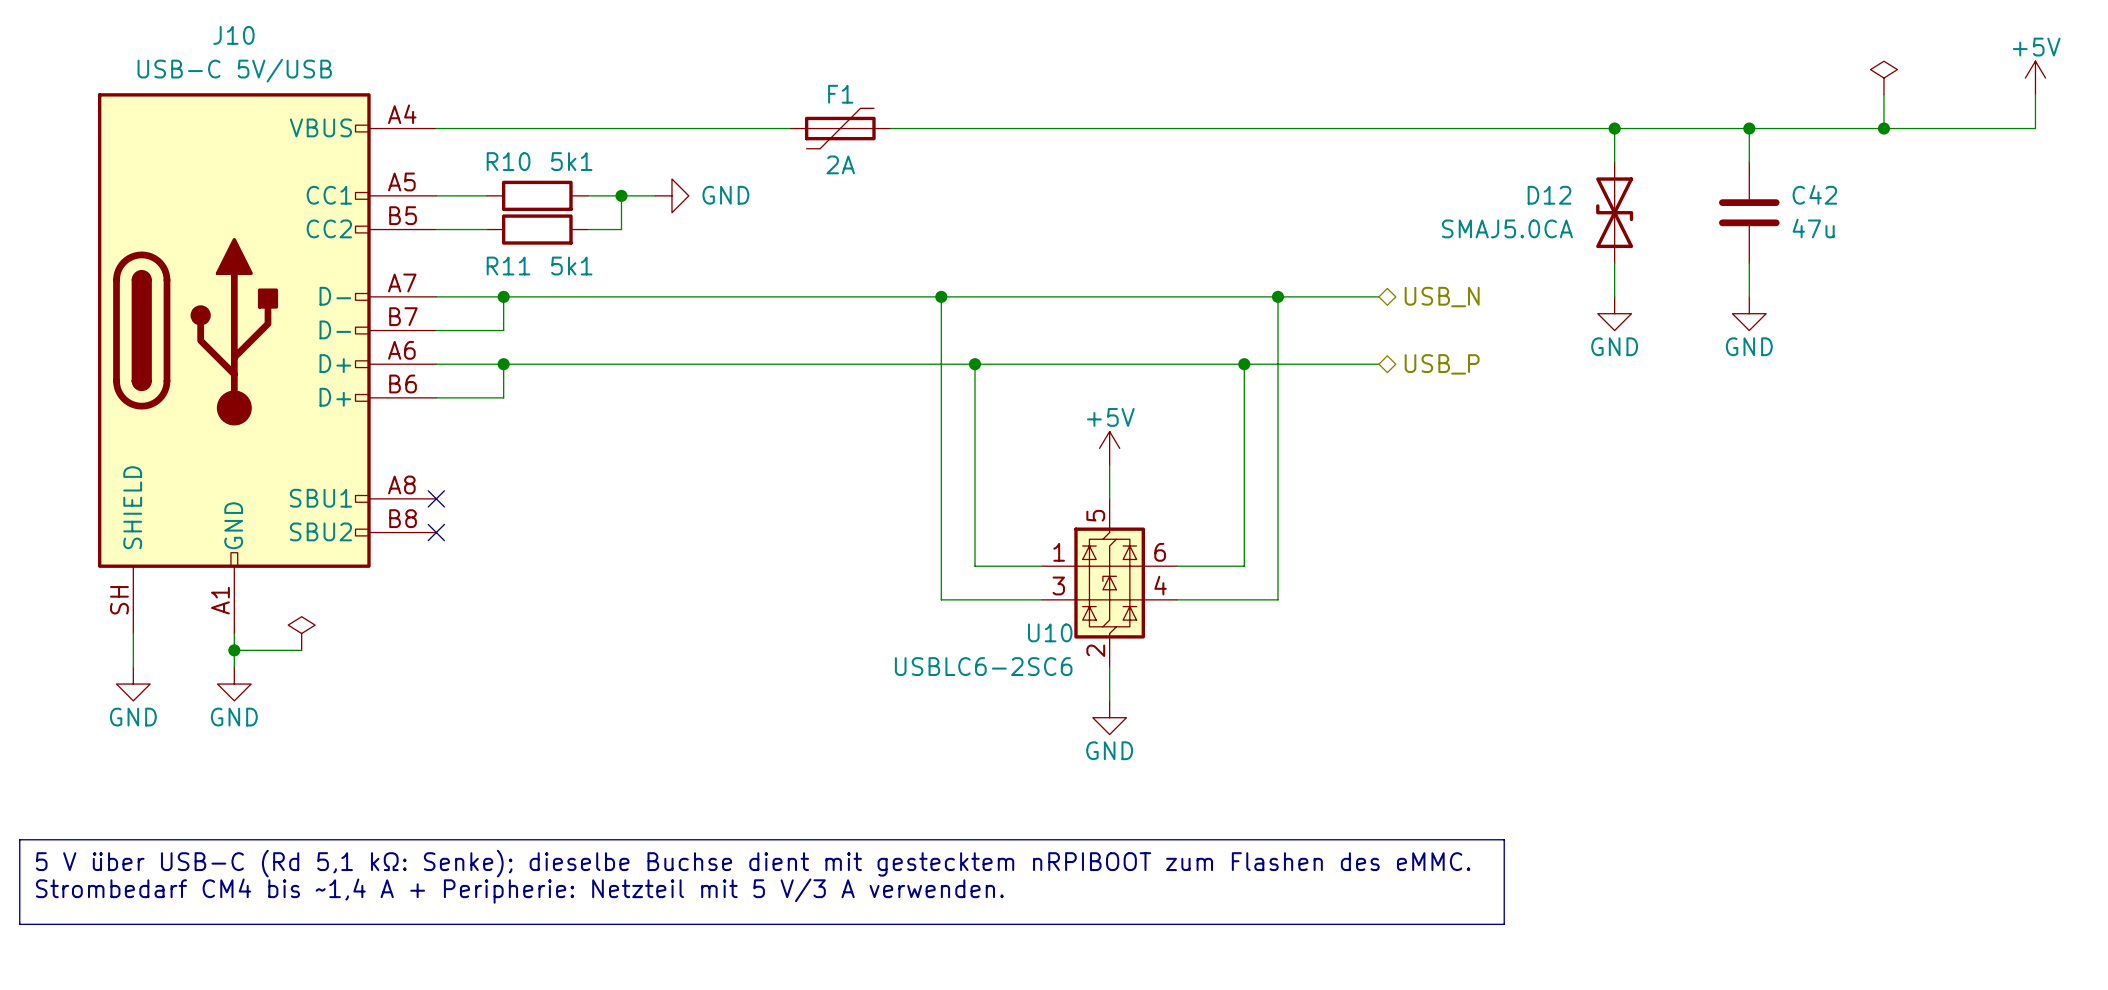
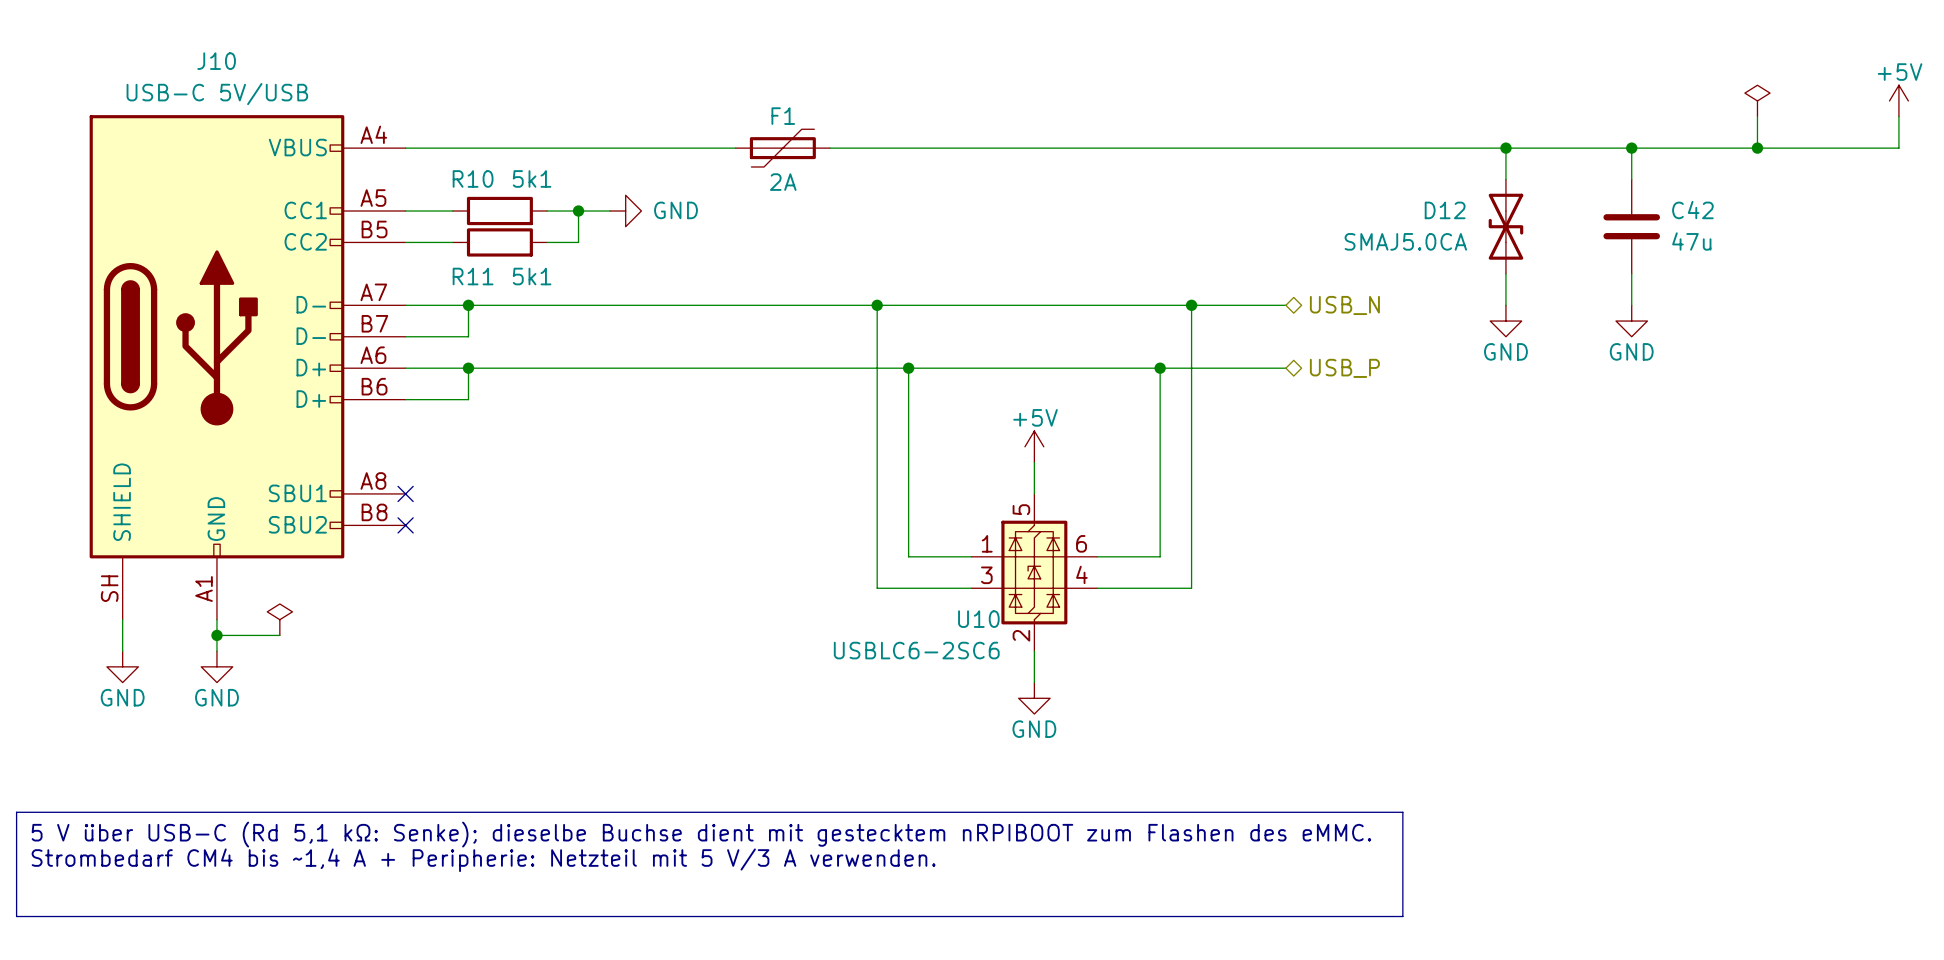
line: (19, 924) (1504, 924) -> (16, 891) (16, 916) (1402, 916) (1402, 891)

